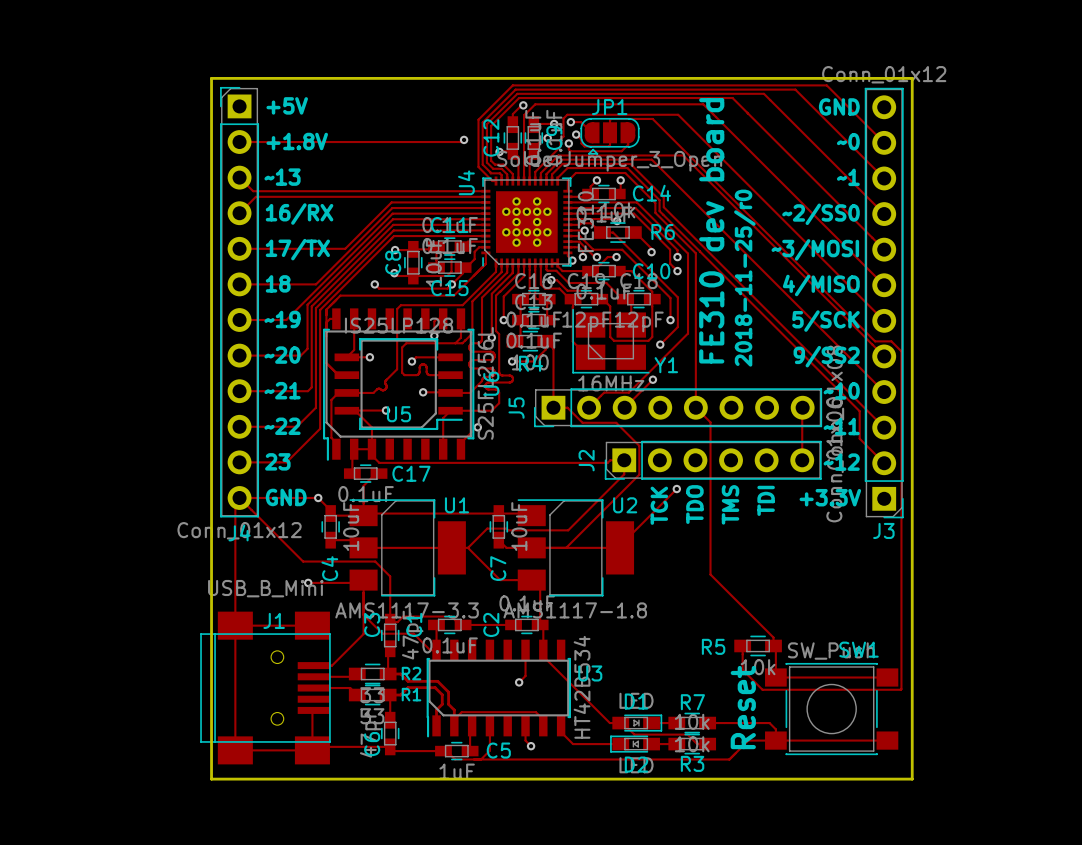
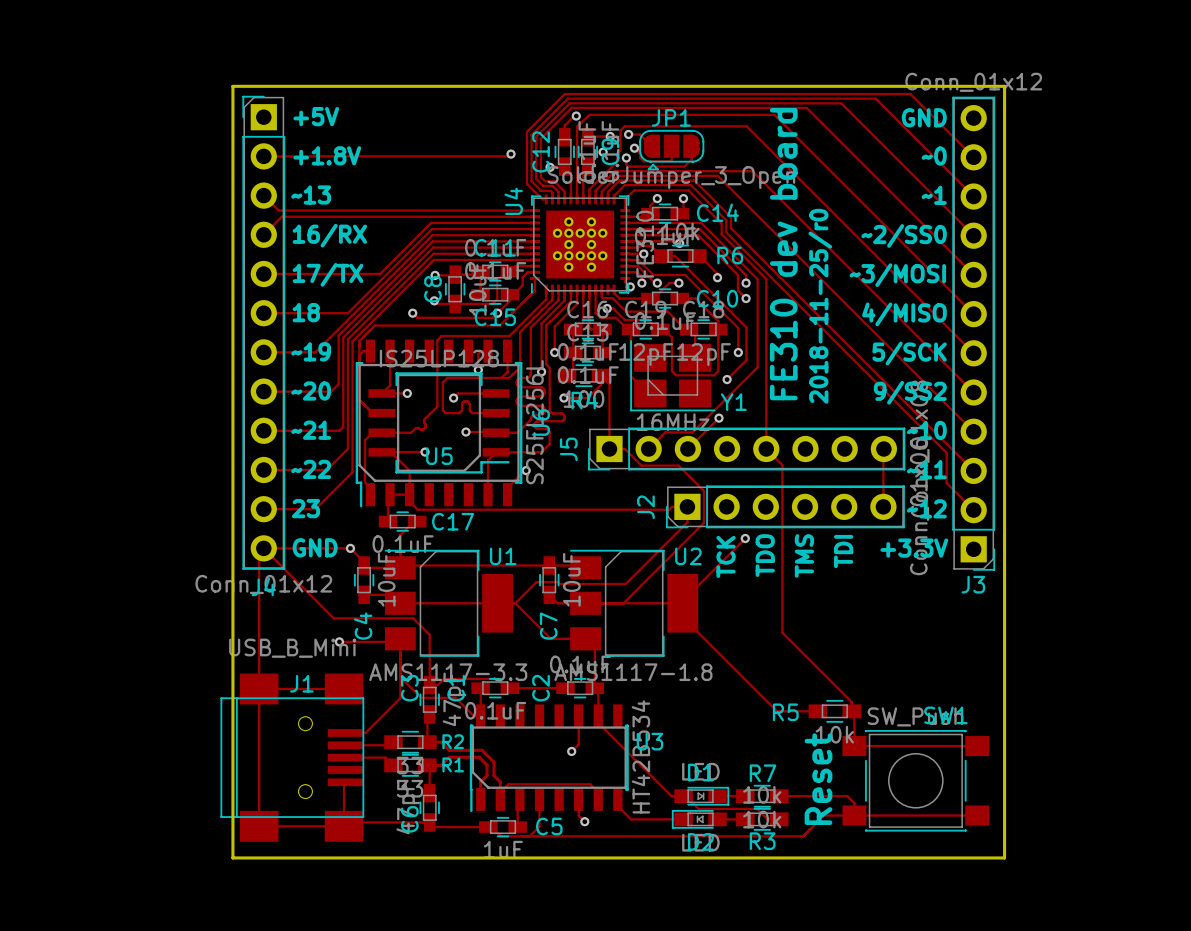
track: (610, 132) (611, 118) (652, 118) (875, 341) (891, 341) (901, 351) (901, 689) (762, 689) (742, 669) (742, 645) -> (682, 617) (776, 711) (817, 711)

